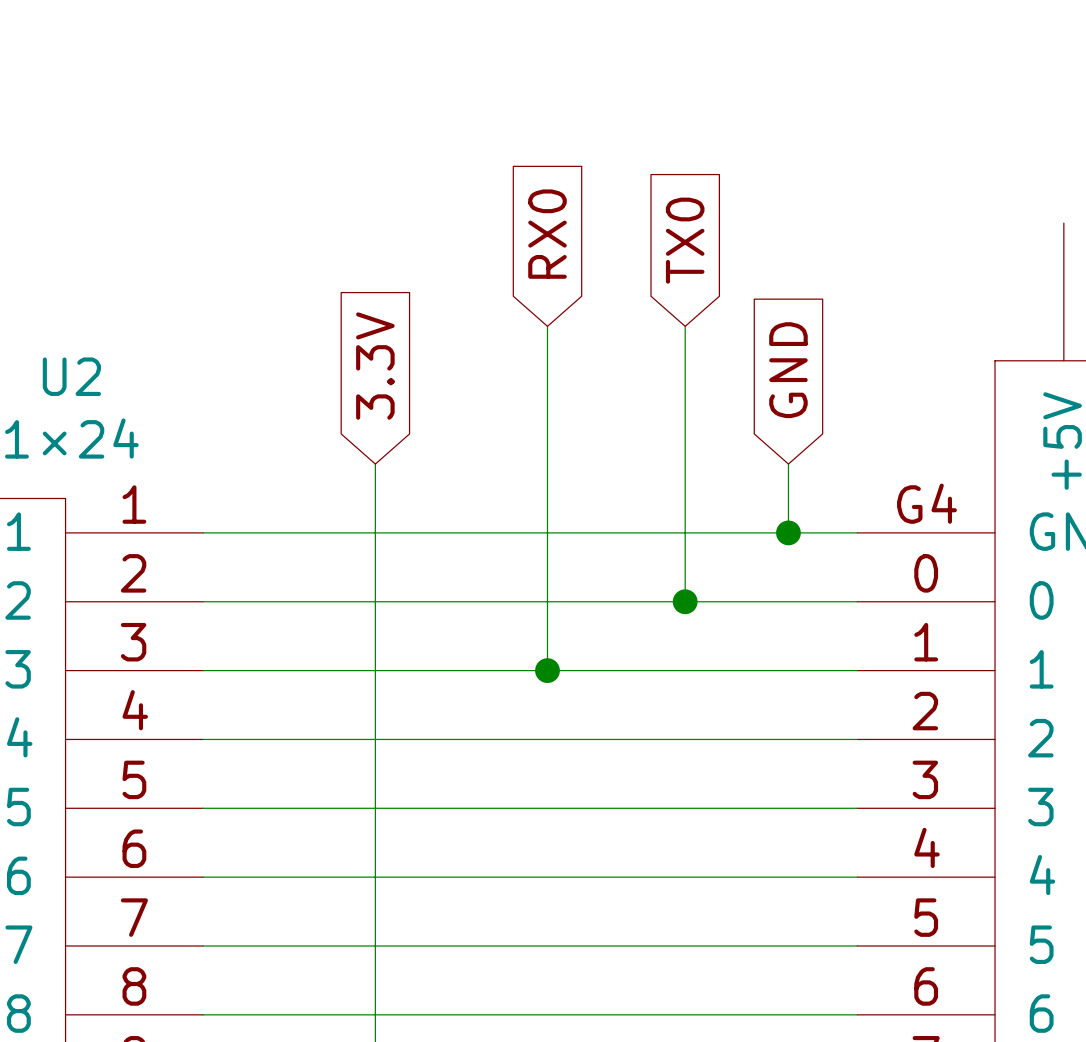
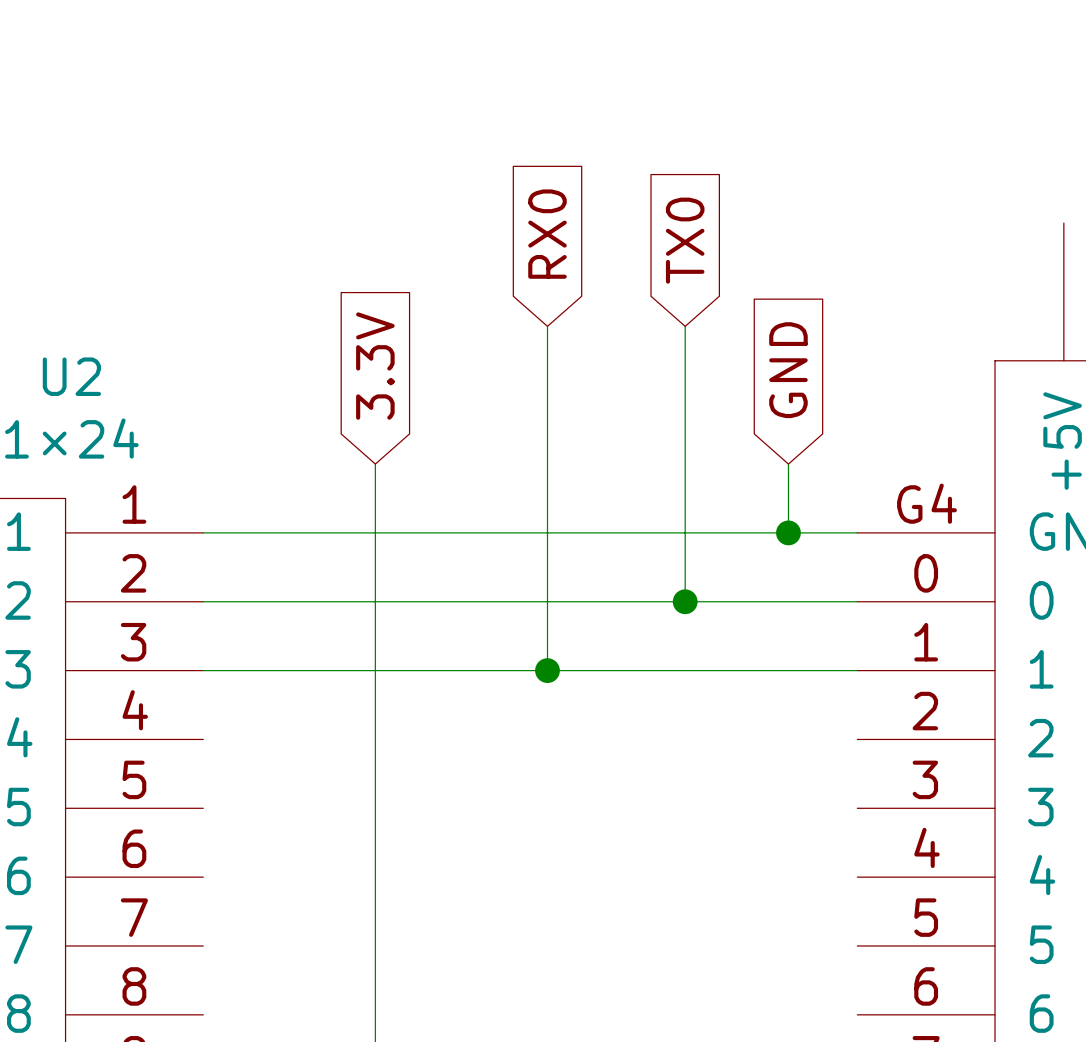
wire: (203, 739) (857, 739) -> none
wire: (203, 808) (857, 808) -> none
wire: (203, 877) (857, 877) -> none
wire: (203, 945) (857, 945) -> none
wire: (203, 1014) (857, 1014) -> none

